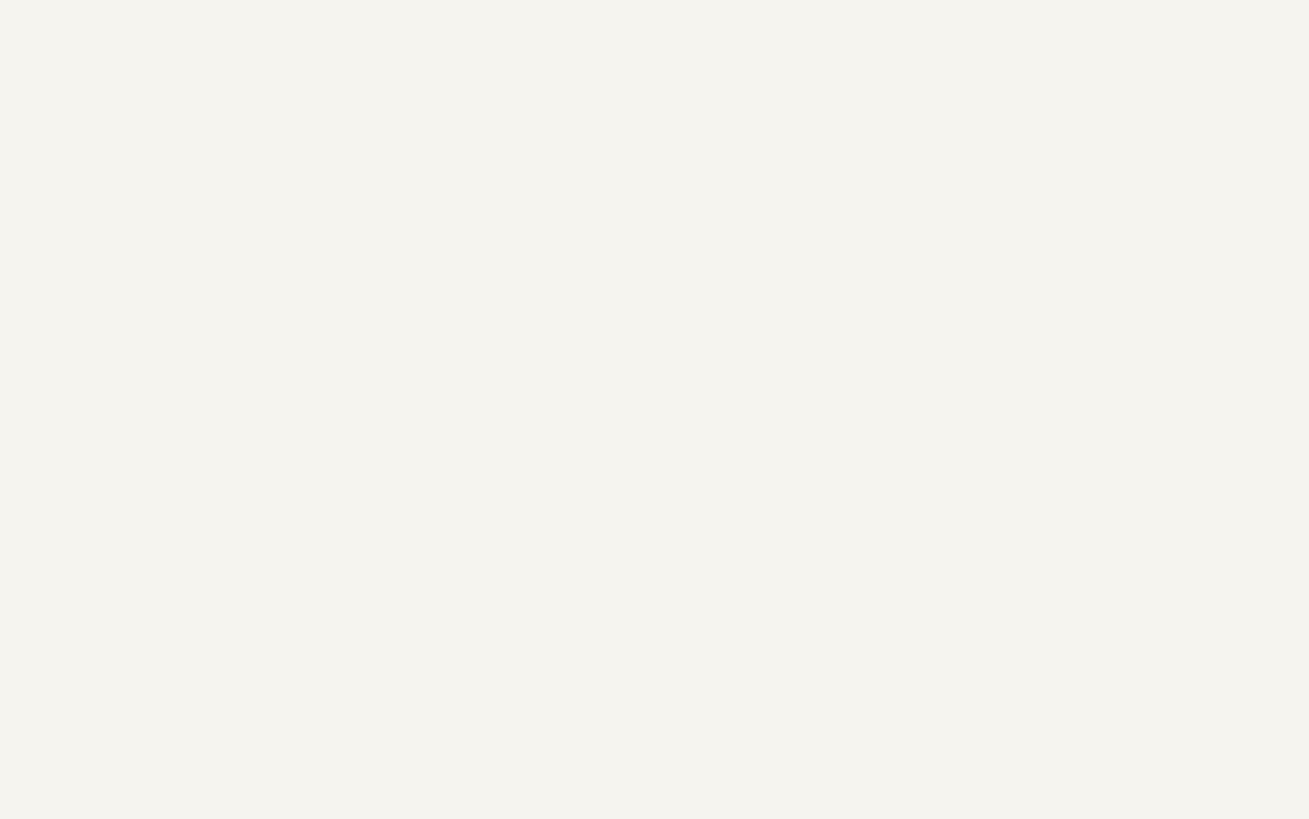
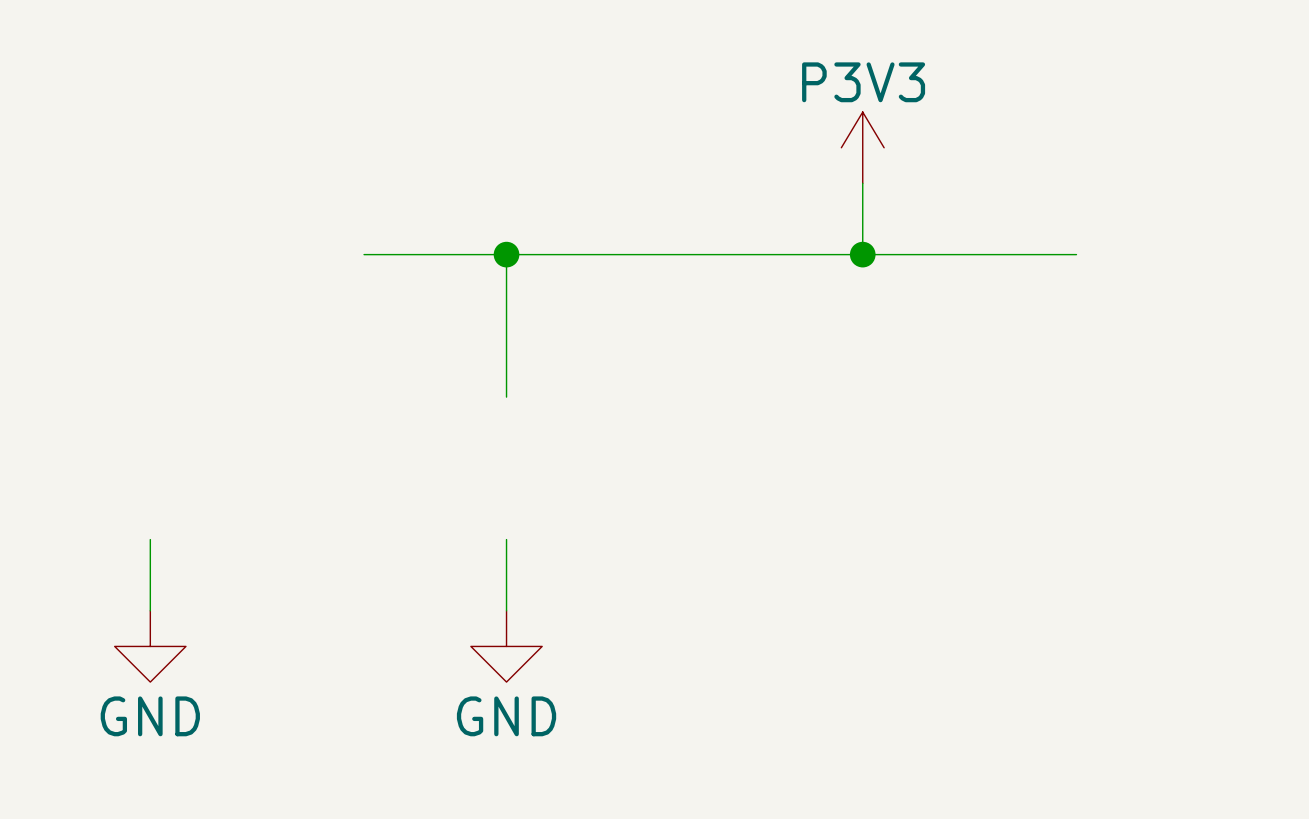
power symbol: none -> P3V3 (862, 147)
wire: none -> (862, 183) (862, 254)
wire: none -> (364, 254) (1076, 254)
wire: none -> (506, 254) (506, 397)
junction: none -> (506, 254)
junction: none -> (862, 254)
wire: none -> (150, 539) (150, 610)
wire: none -> (506, 539) (506, 610)
power symbol: none -> GND (150, 646)
power symbol: none -> GND (506, 646)

